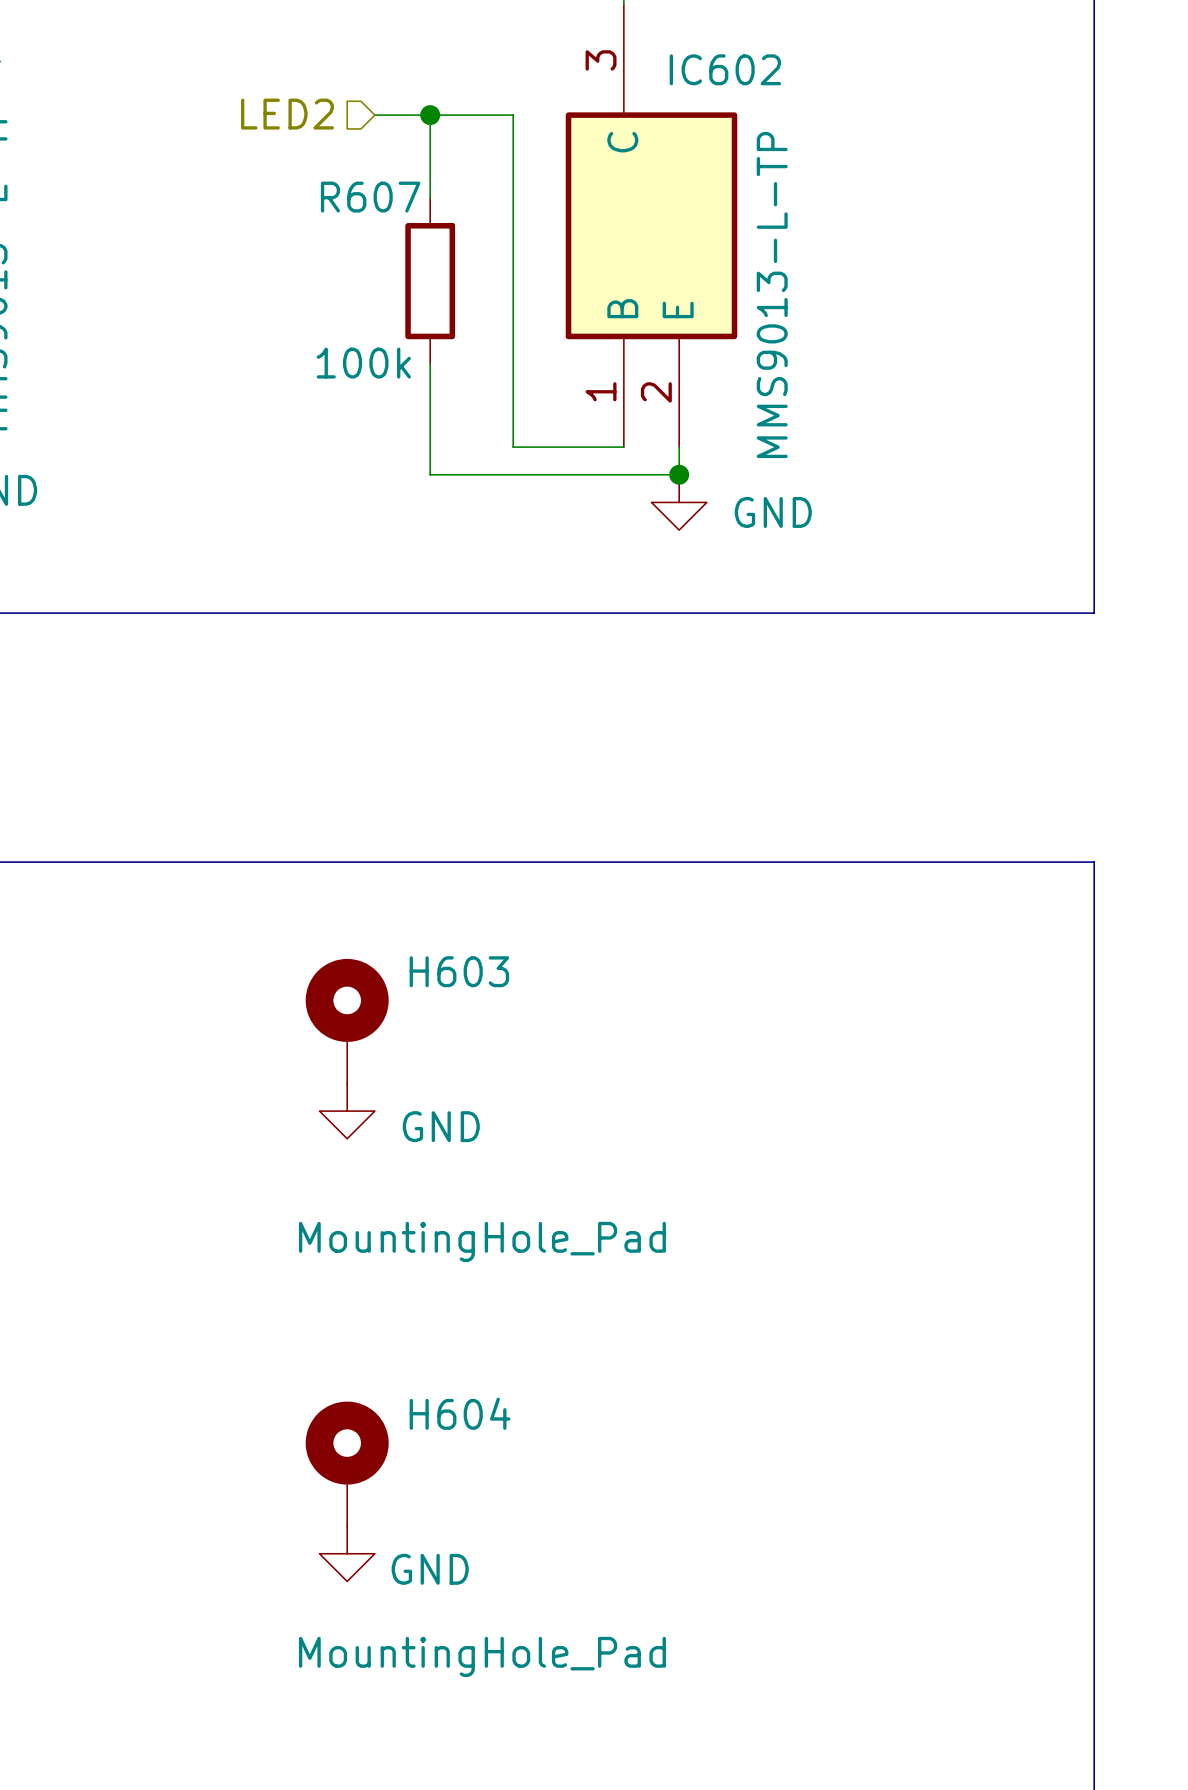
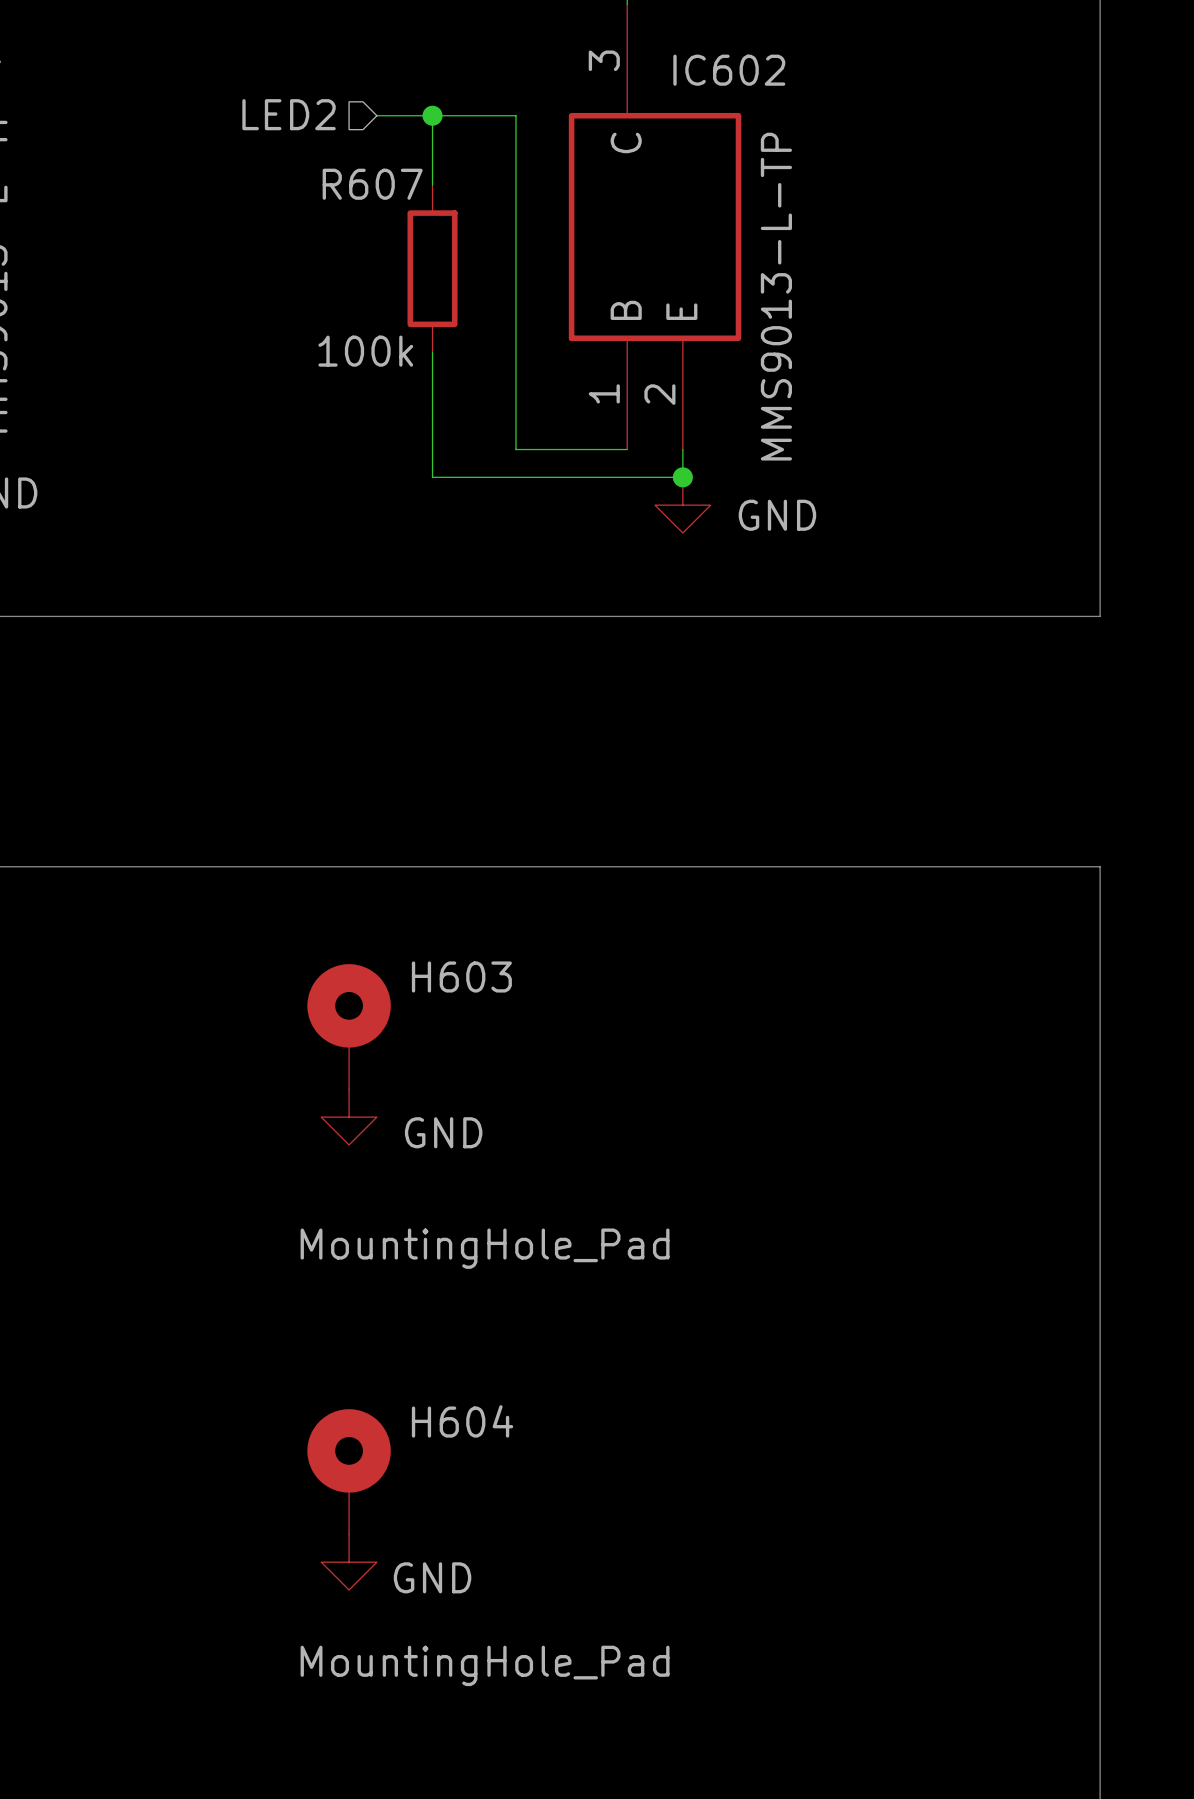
R607 position: (430, 281) -> (432, 268)

